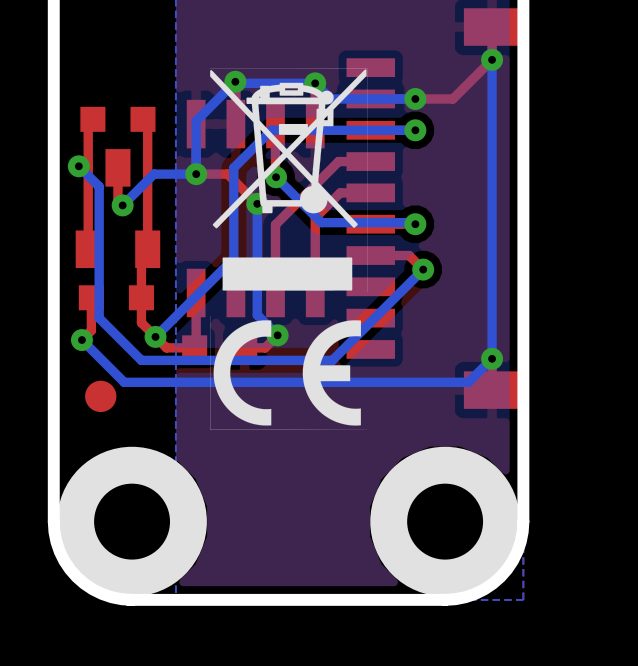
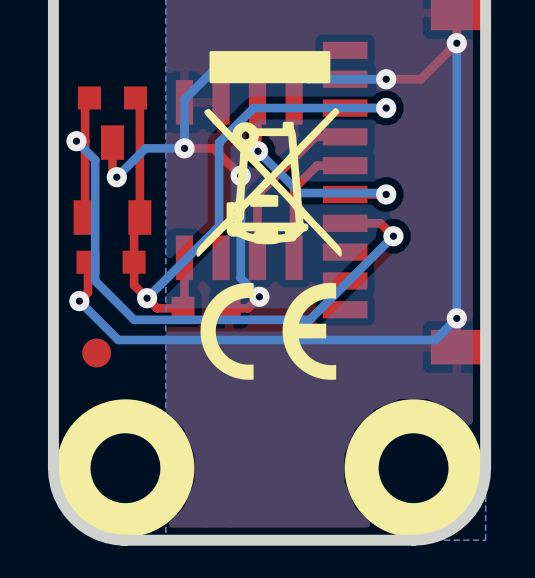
drawing shape: [209, 68, 368, 293] -> [196, 51, 342, 257]
drawing shape: [210, 315, 367, 430] -> [200, 282, 337, 380]

